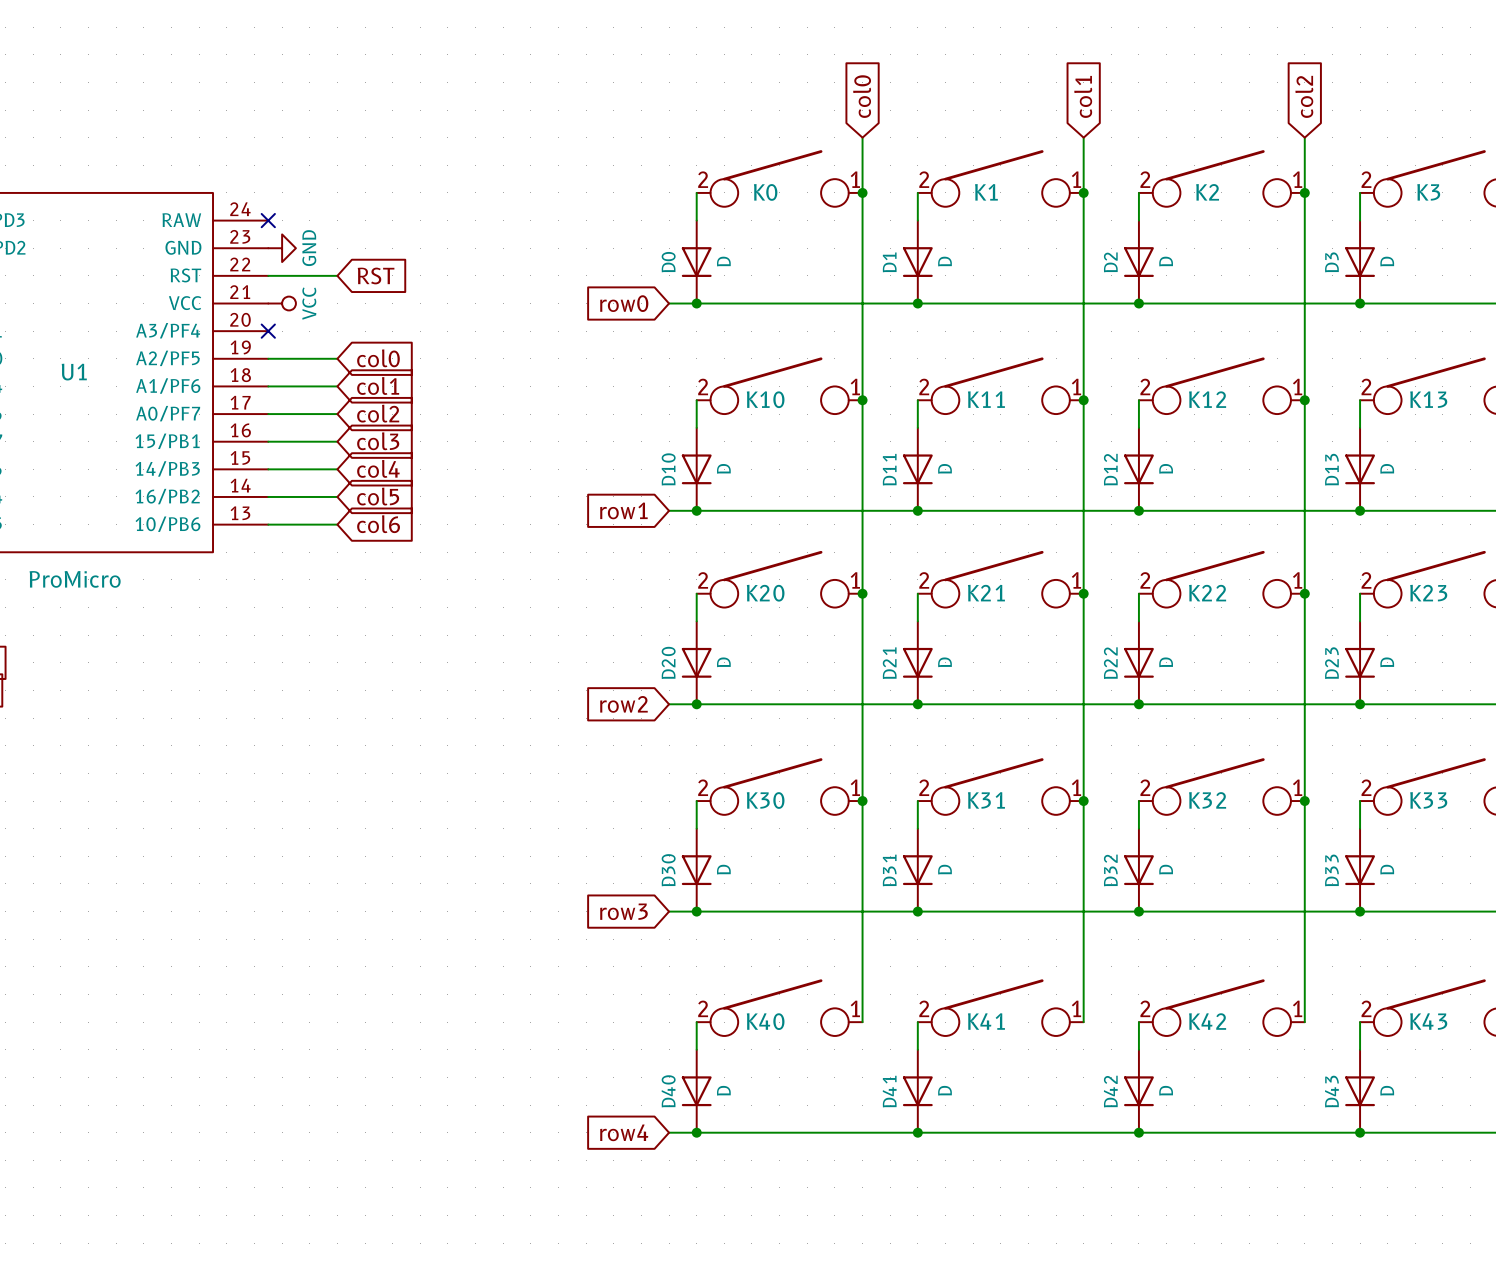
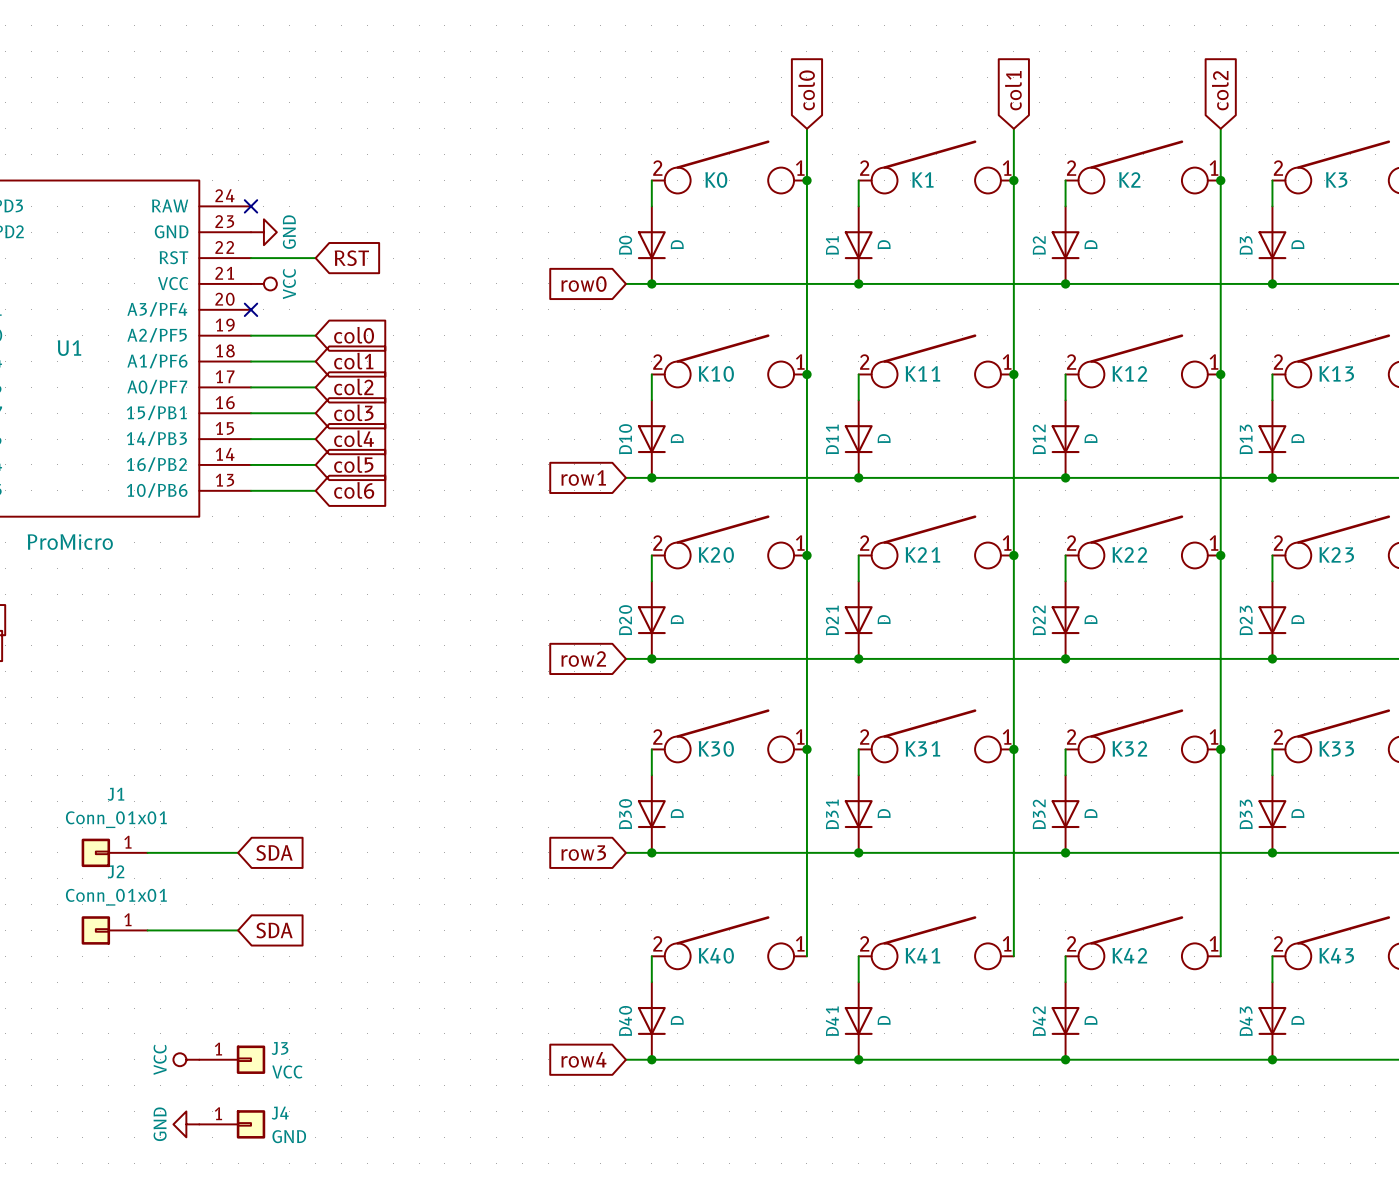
J1: none -> Conn_01x01 (114, 852)
wire: none -> (147, 852) (238, 852)
global label: none -> SDA (274, 852)
J2: none -> Conn_01x01 (114, 930)
wire: none -> (147, 930) (238, 930)
global label: none -> SDA (274, 930)
power symbol: none -> VCC (186, 1059)
J3: none -> VCC (232, 1059)
power symbol: none -> GND (186, 1124)
J4: none -> GND (232, 1124)

